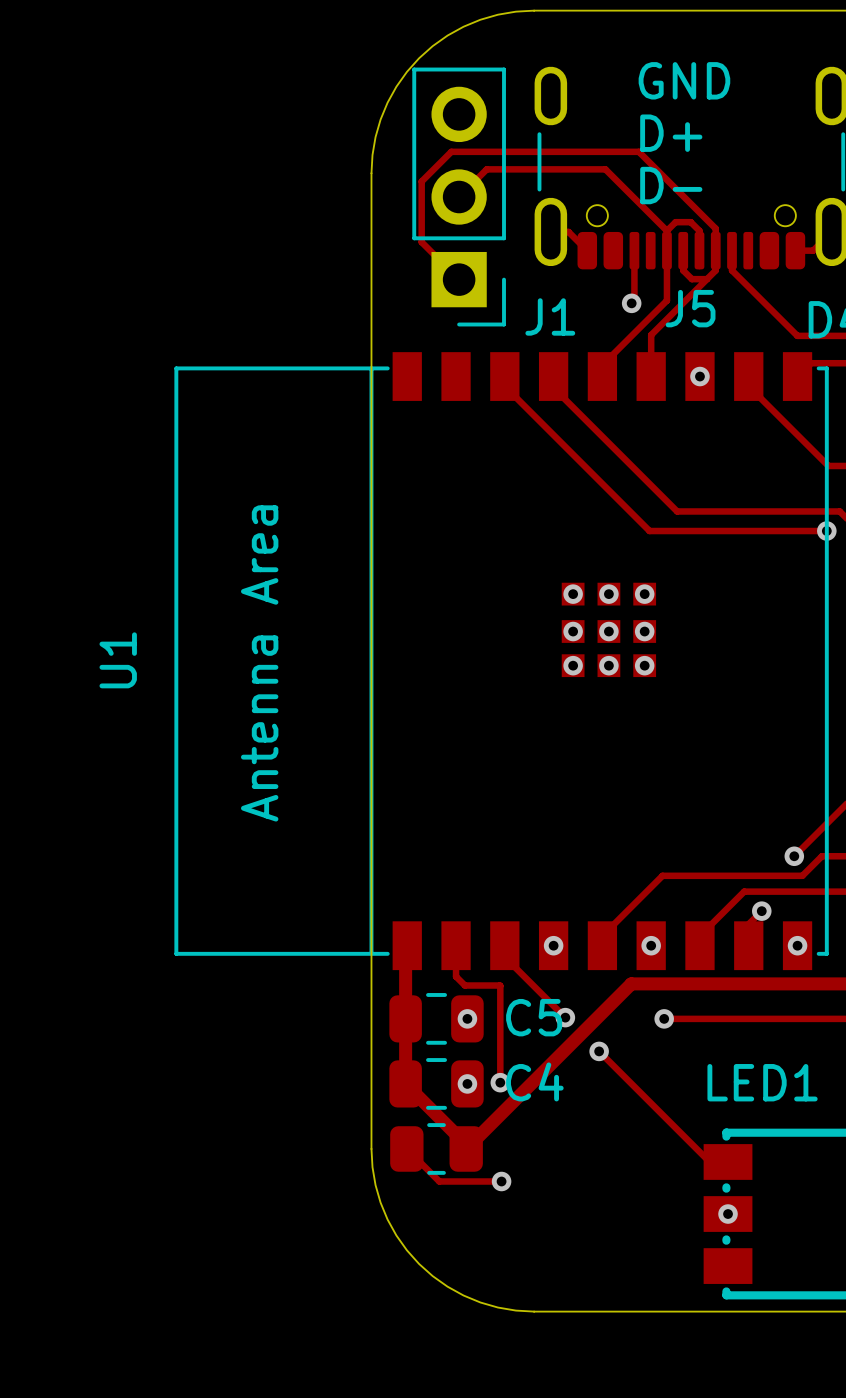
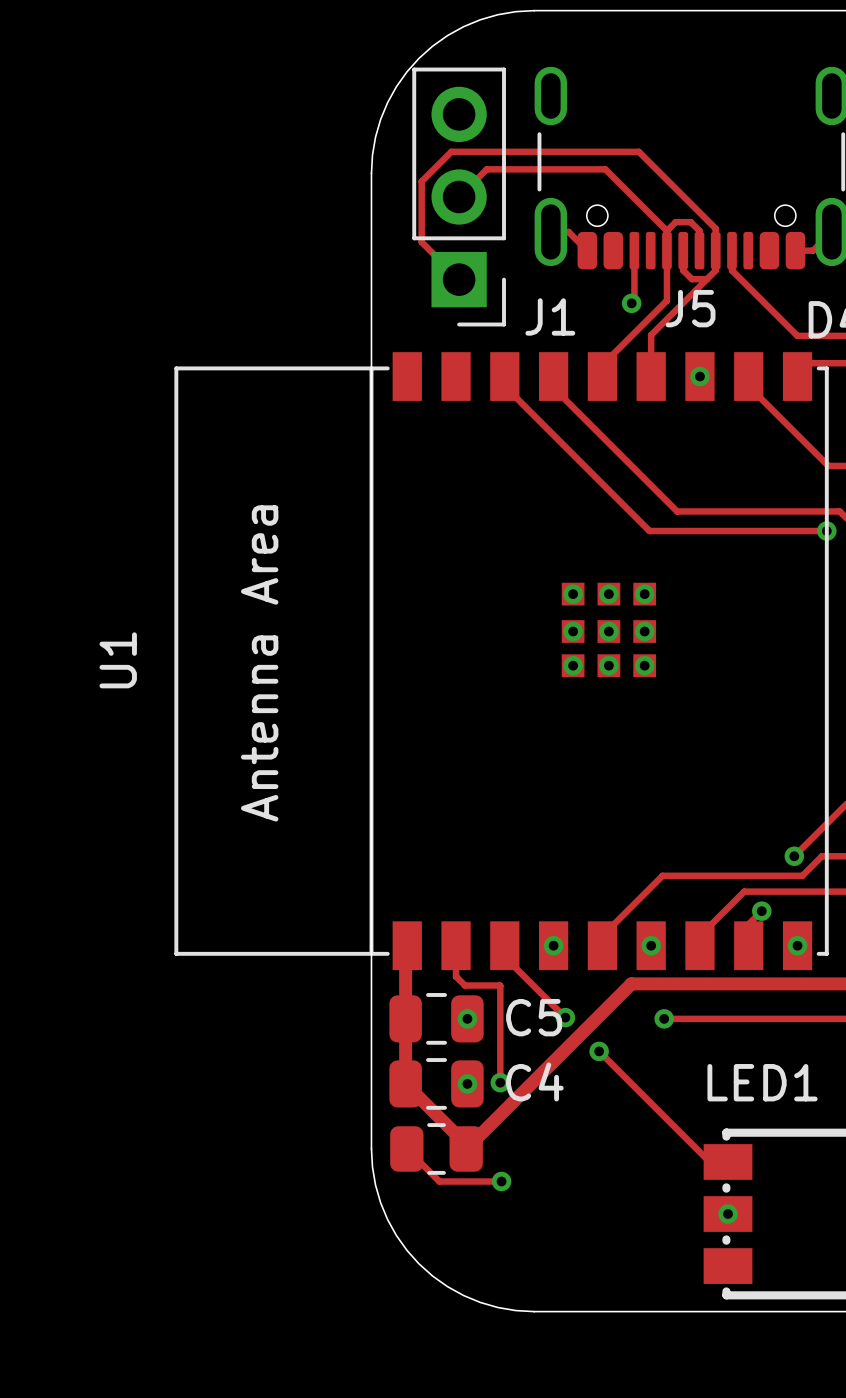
text: GND (684, 80) -> none
text: D+ (671, 133) -> none
text: D- (671, 185) -> none

